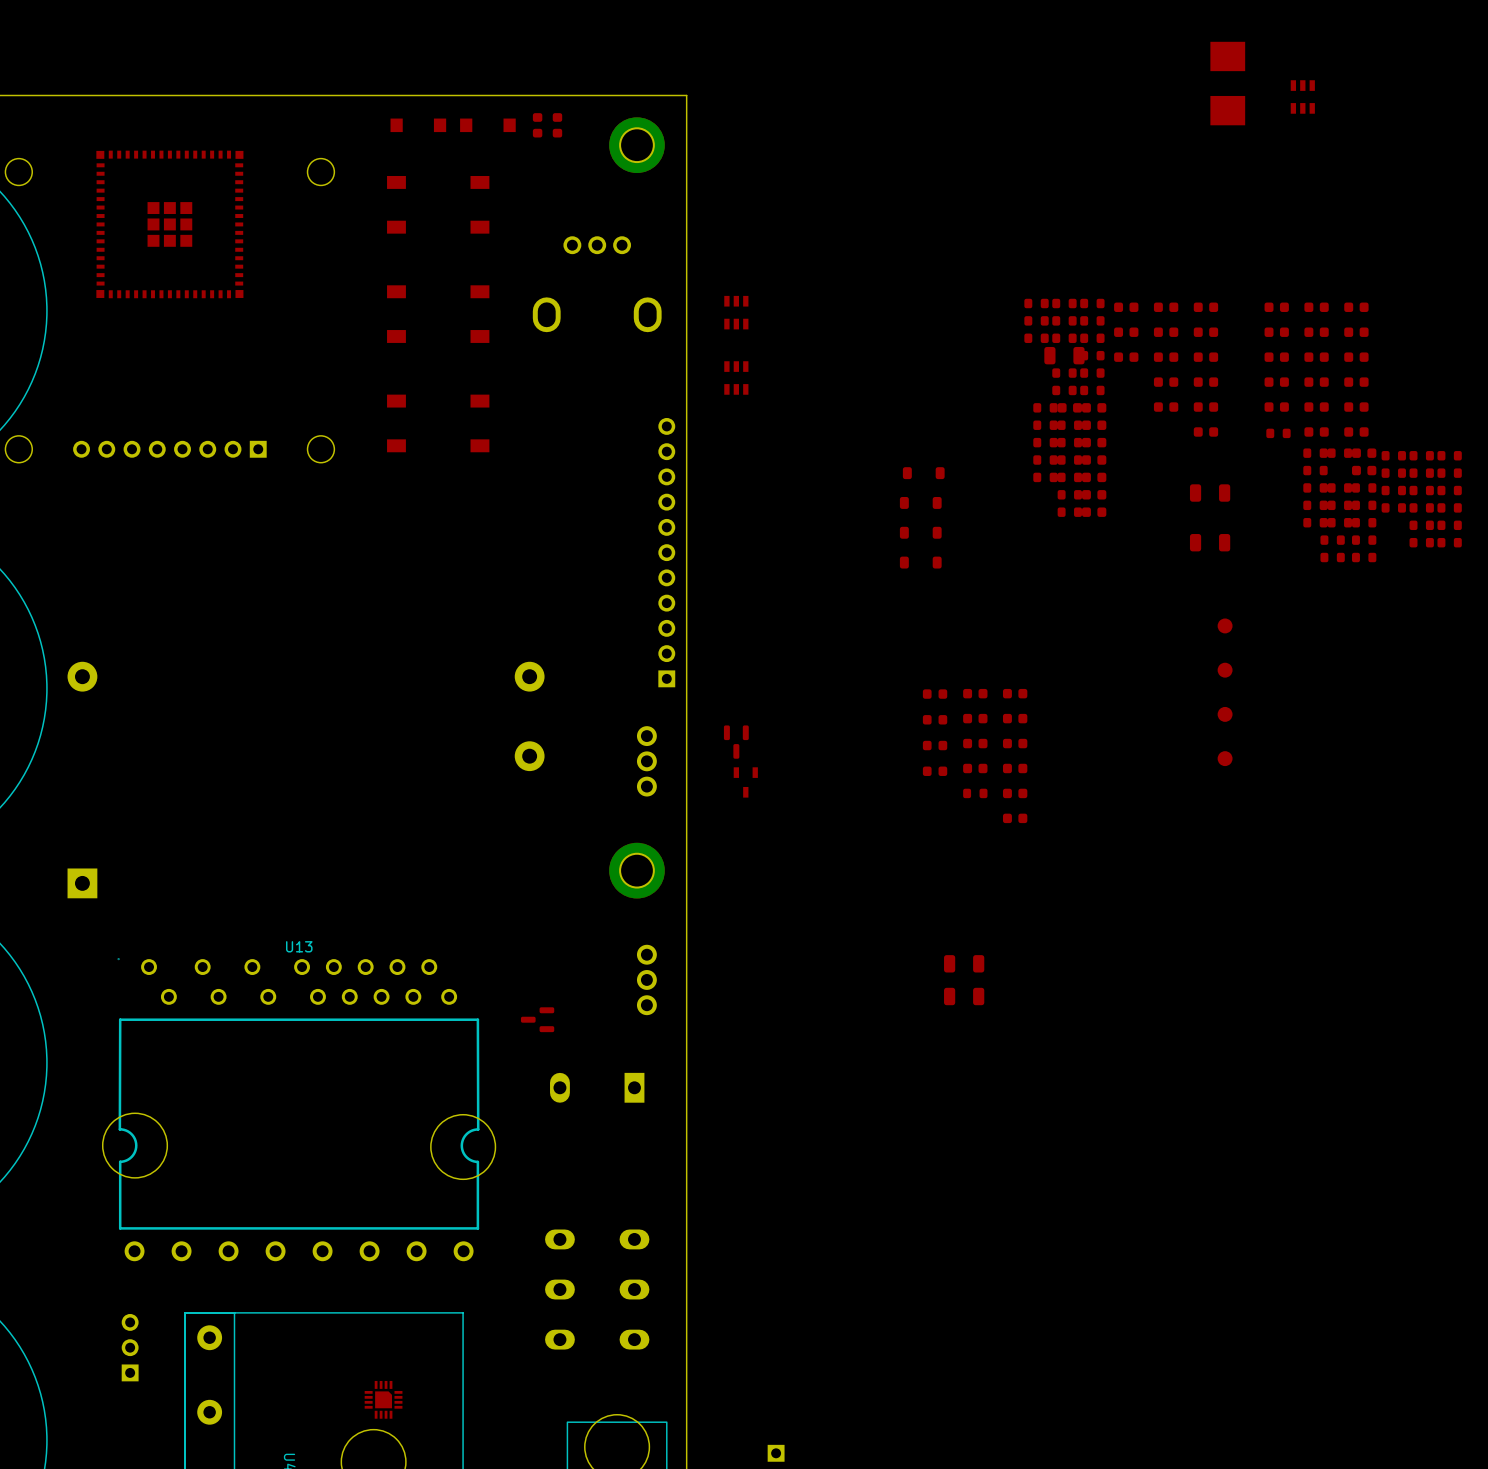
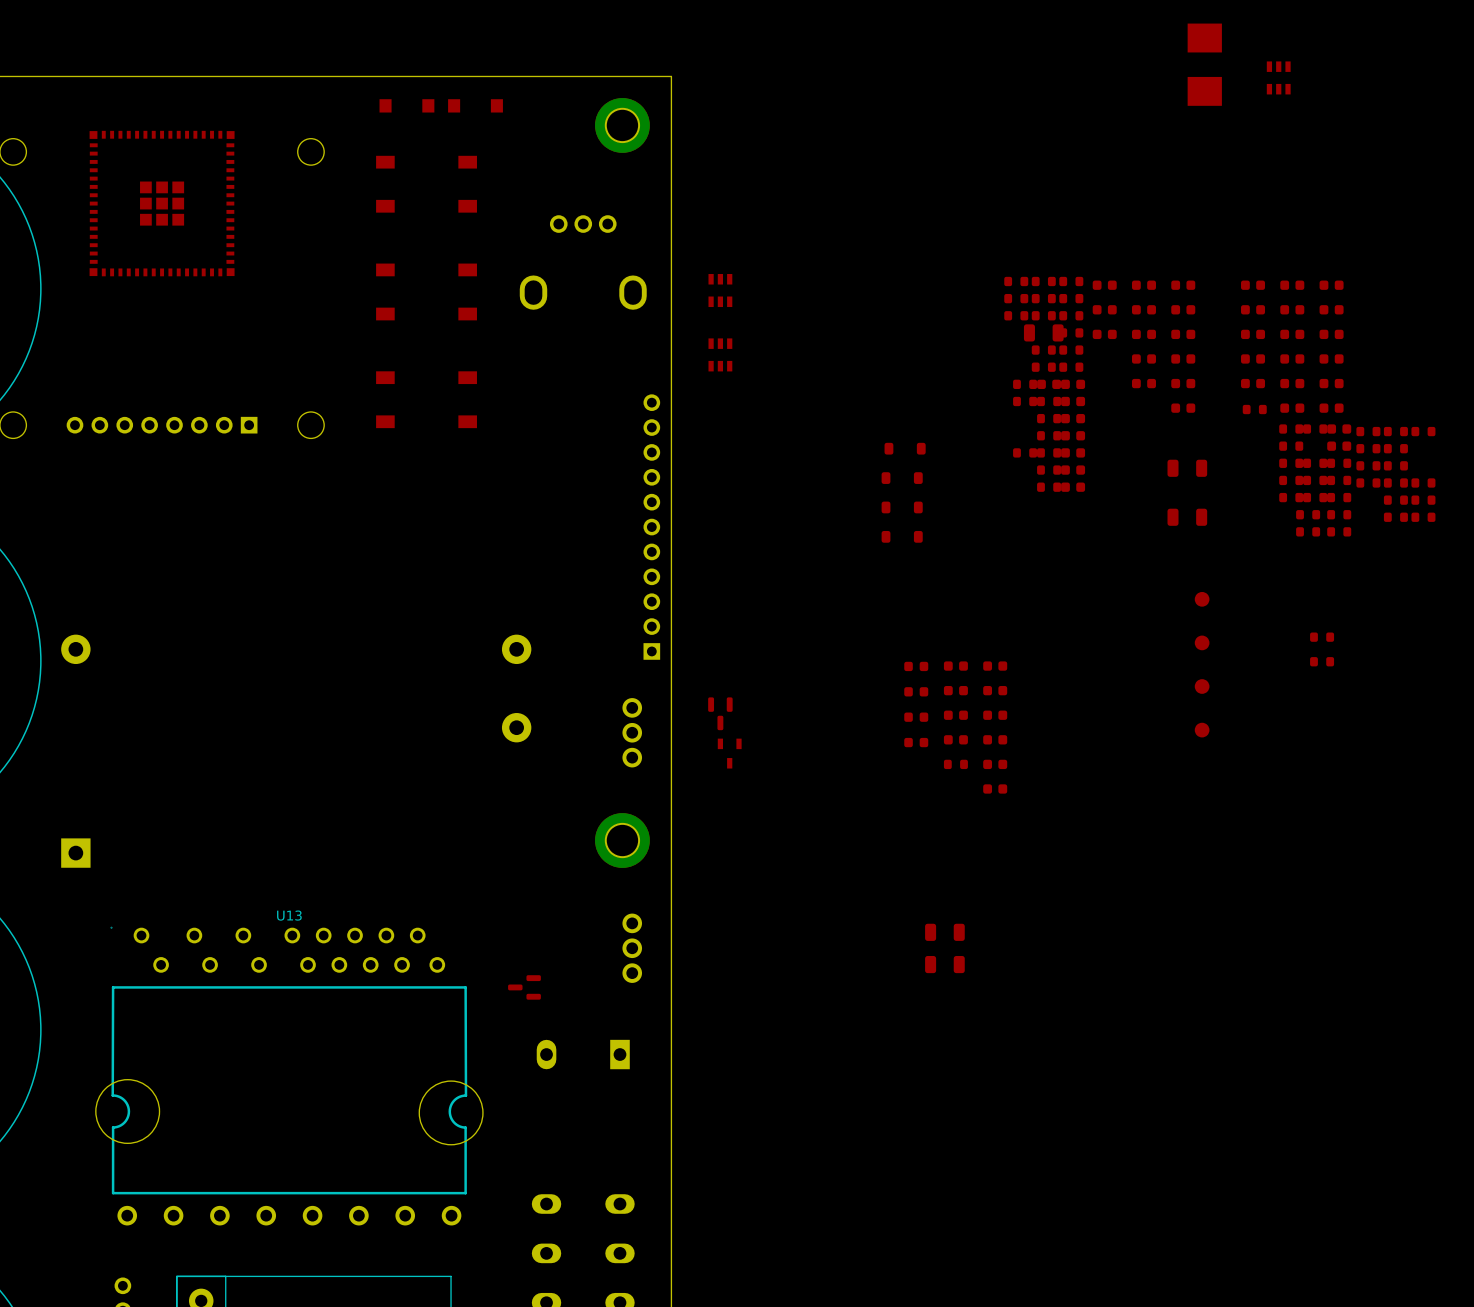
part: (537, 125) -> none
part: (557, 125) -> none
part: (1045, 442) -> none
part: (1045, 460) -> none
part: (1449, 473) -> none
part: (1449, 490) -> none
part: none -> (1322, 637)
part: none -> (1322, 661)

